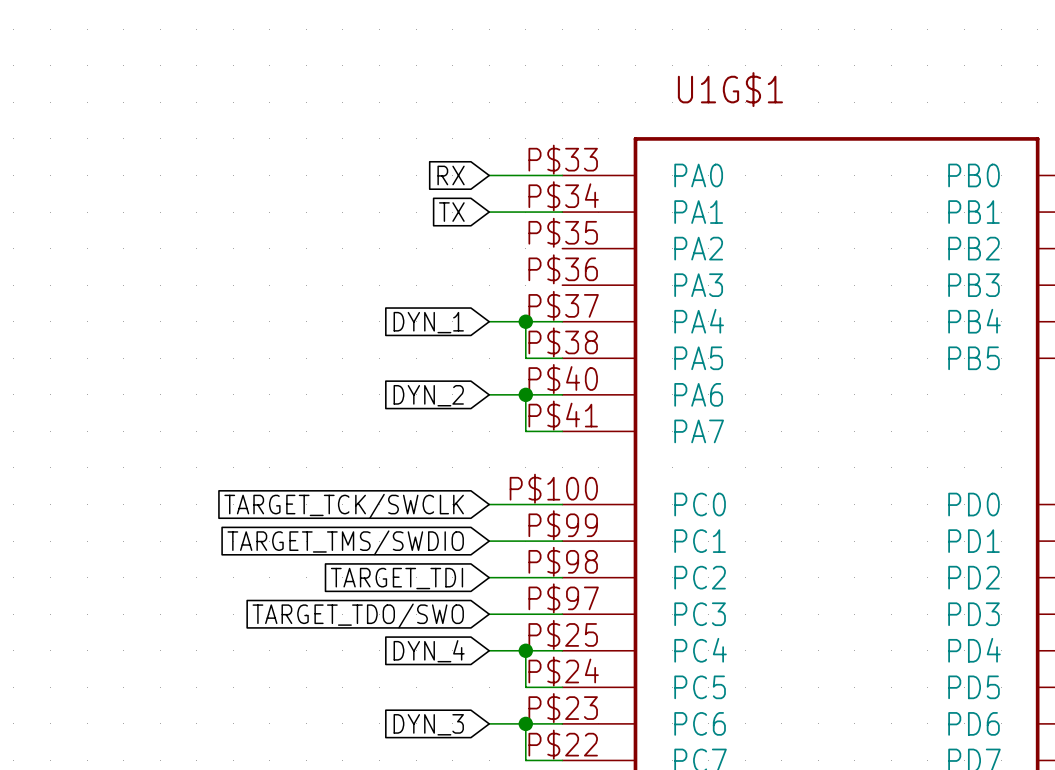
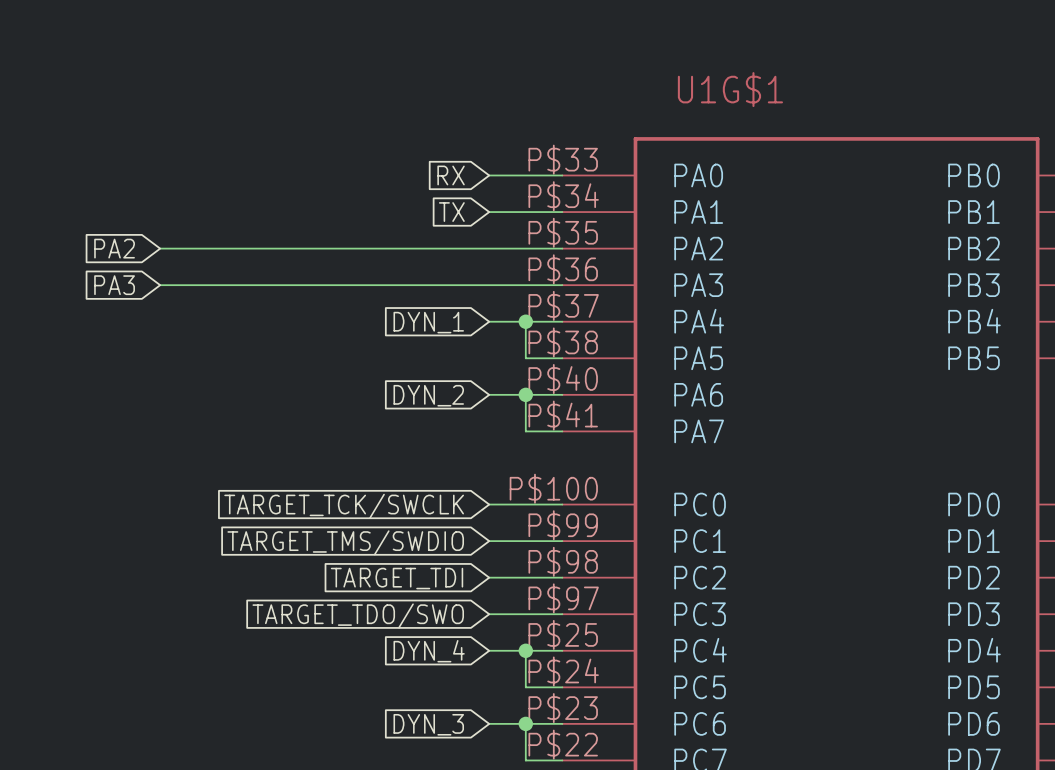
global label: none -> PA2 (114, 248)
wire: none -> (160, 248) (562, 248)
global label: none -> PA3 (114, 285)
wire: none -> (160, 285) (562, 285)

